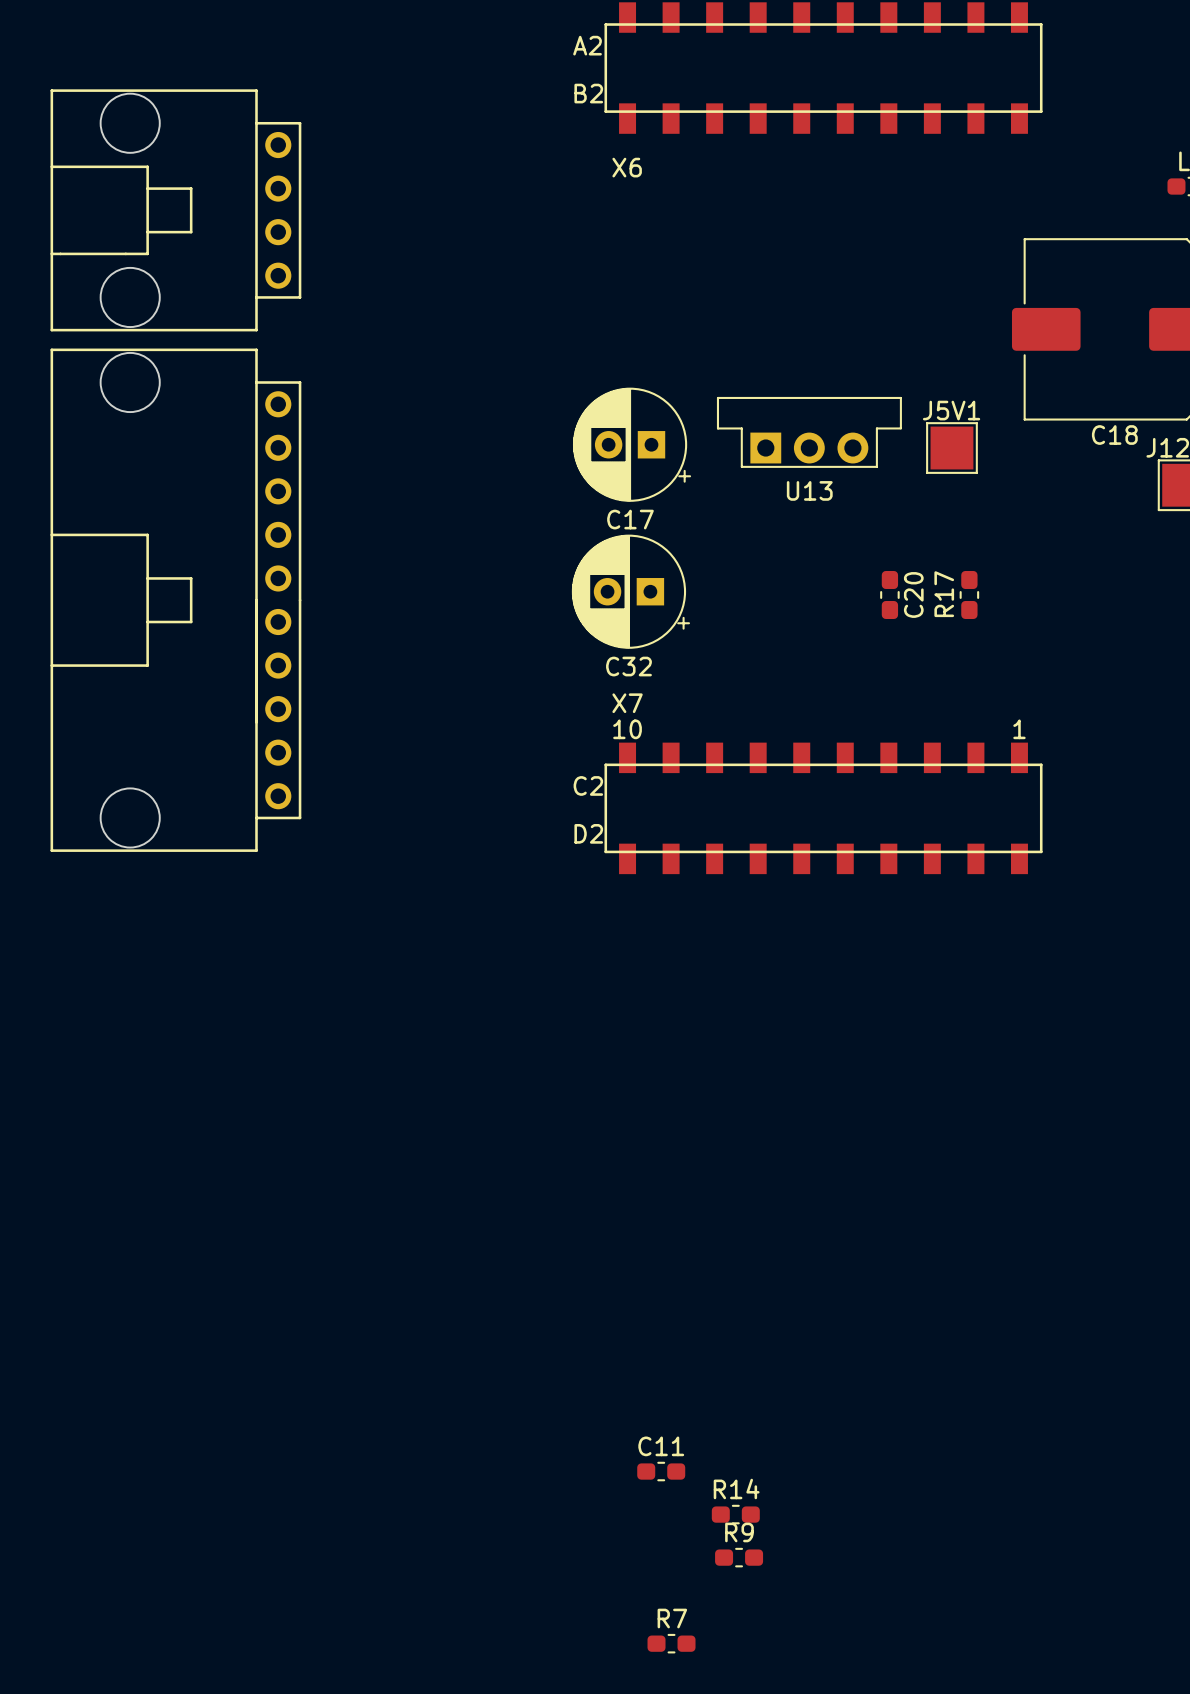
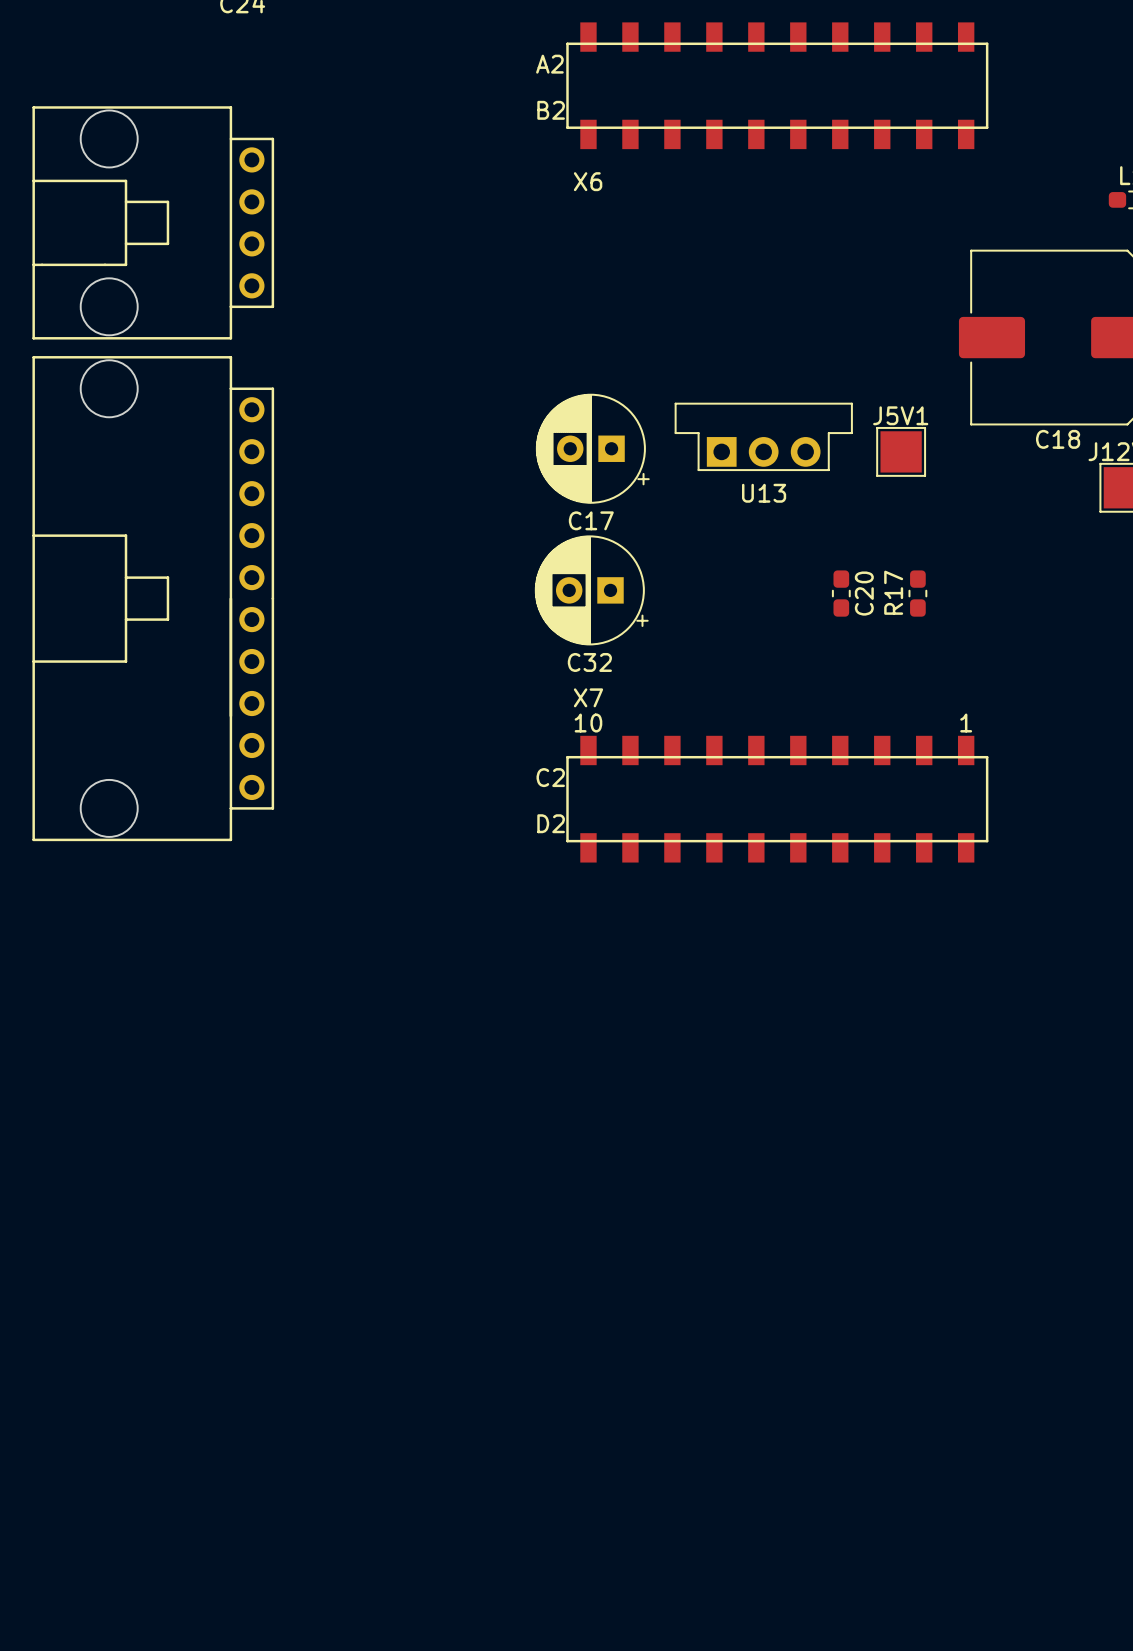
C11: (661, 1471) -> none
R14: (735, 1514) -> none
R9: (739, 1557) -> none
R7: (671, 1643) -> none

